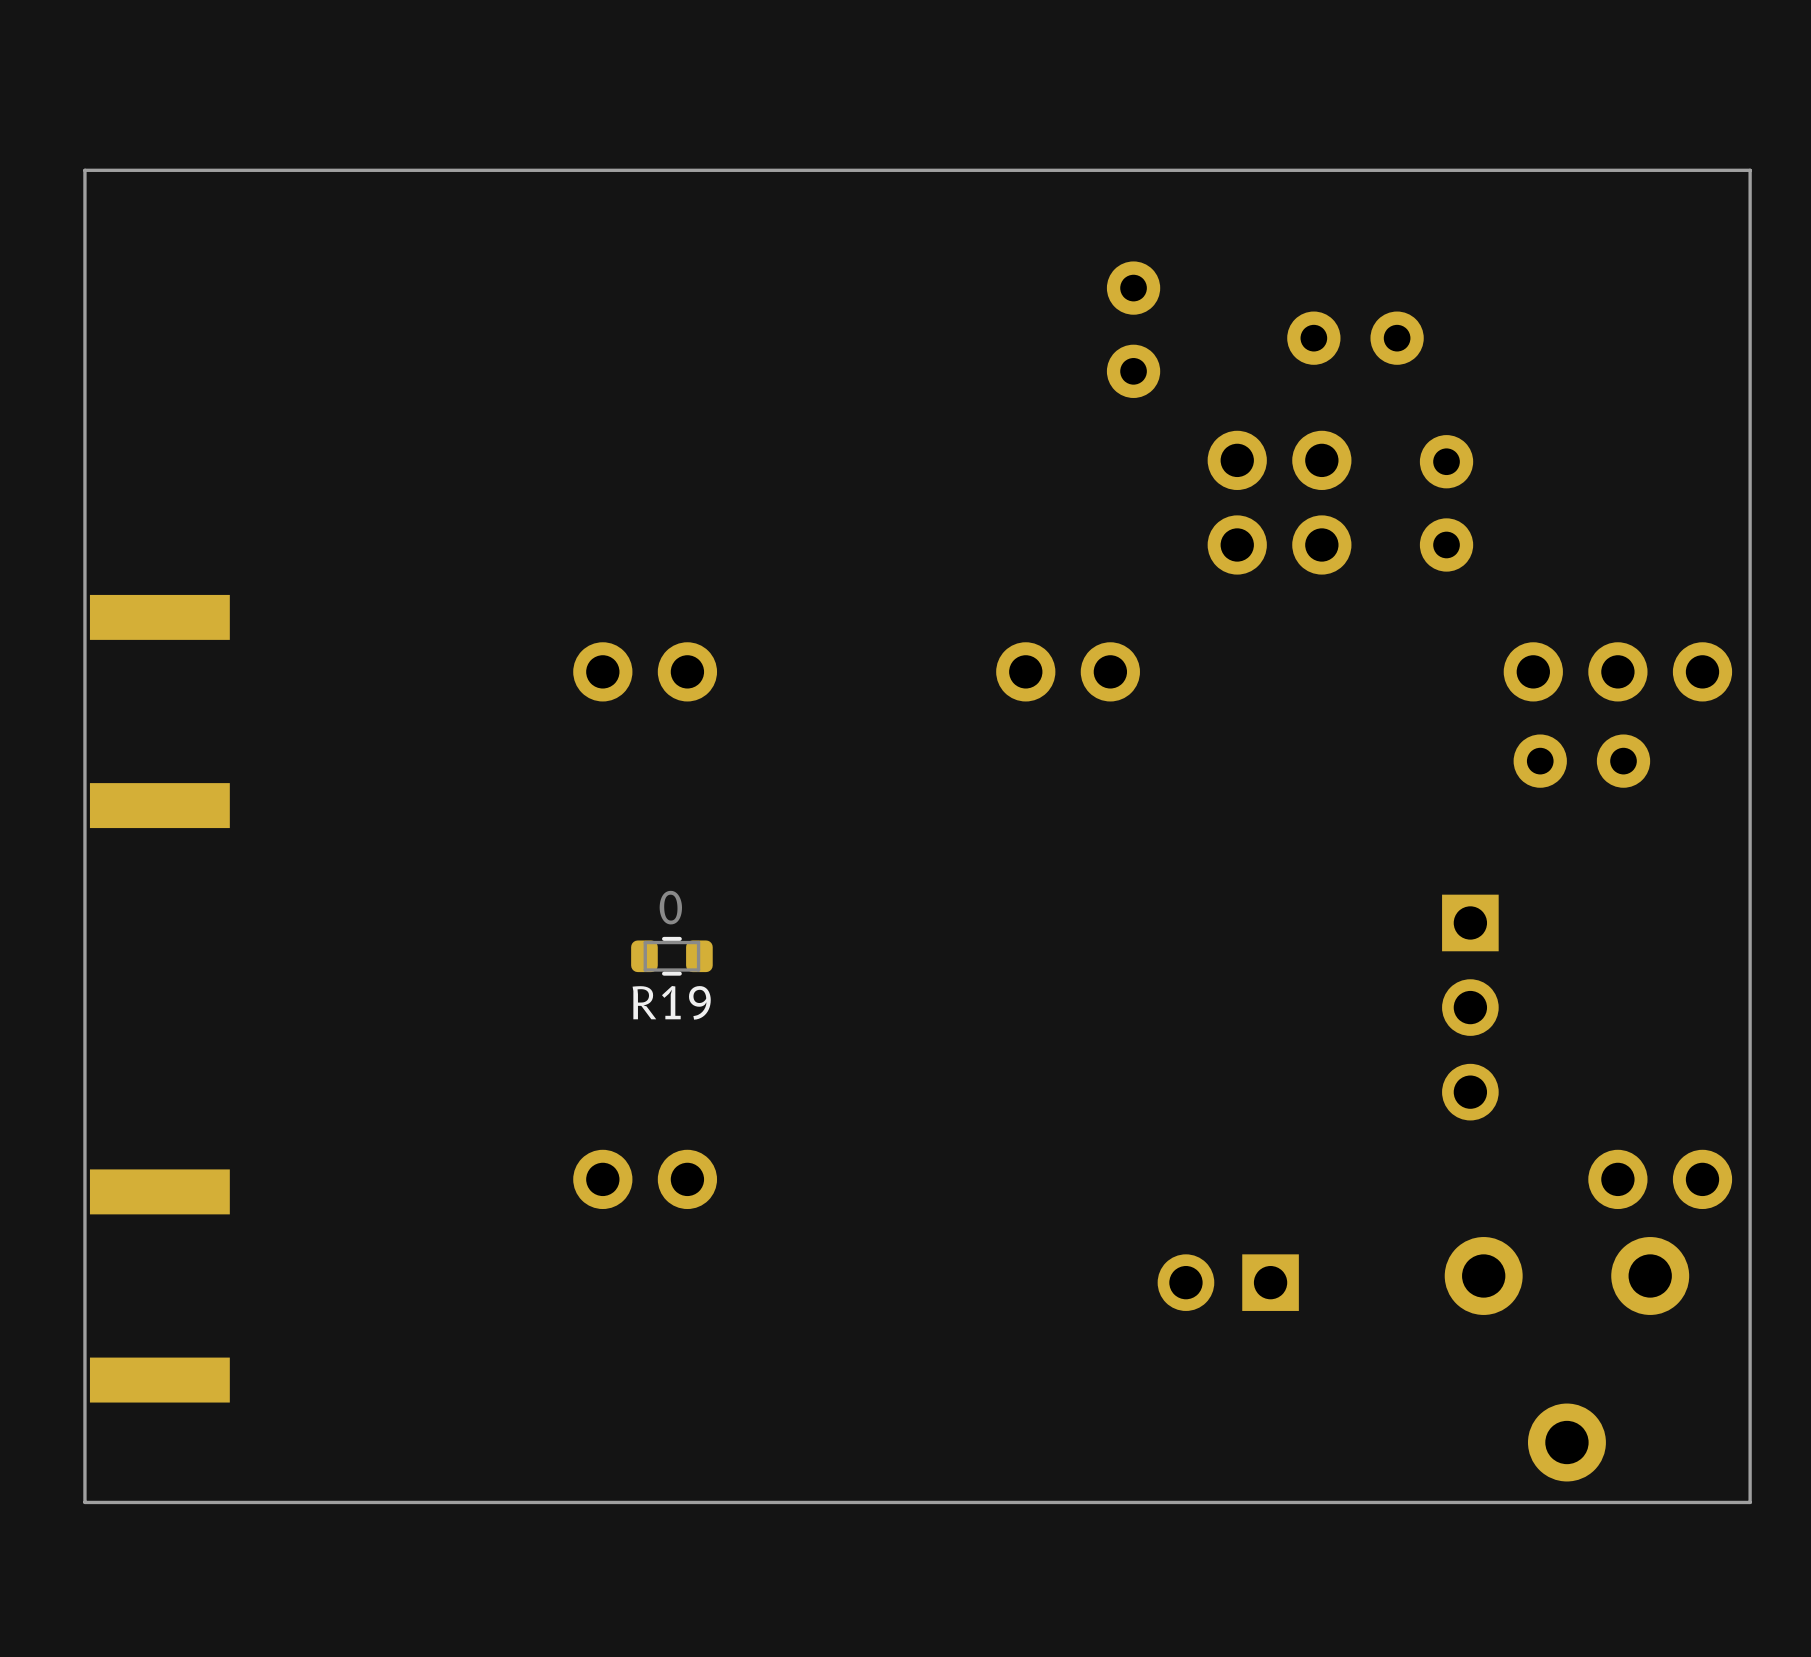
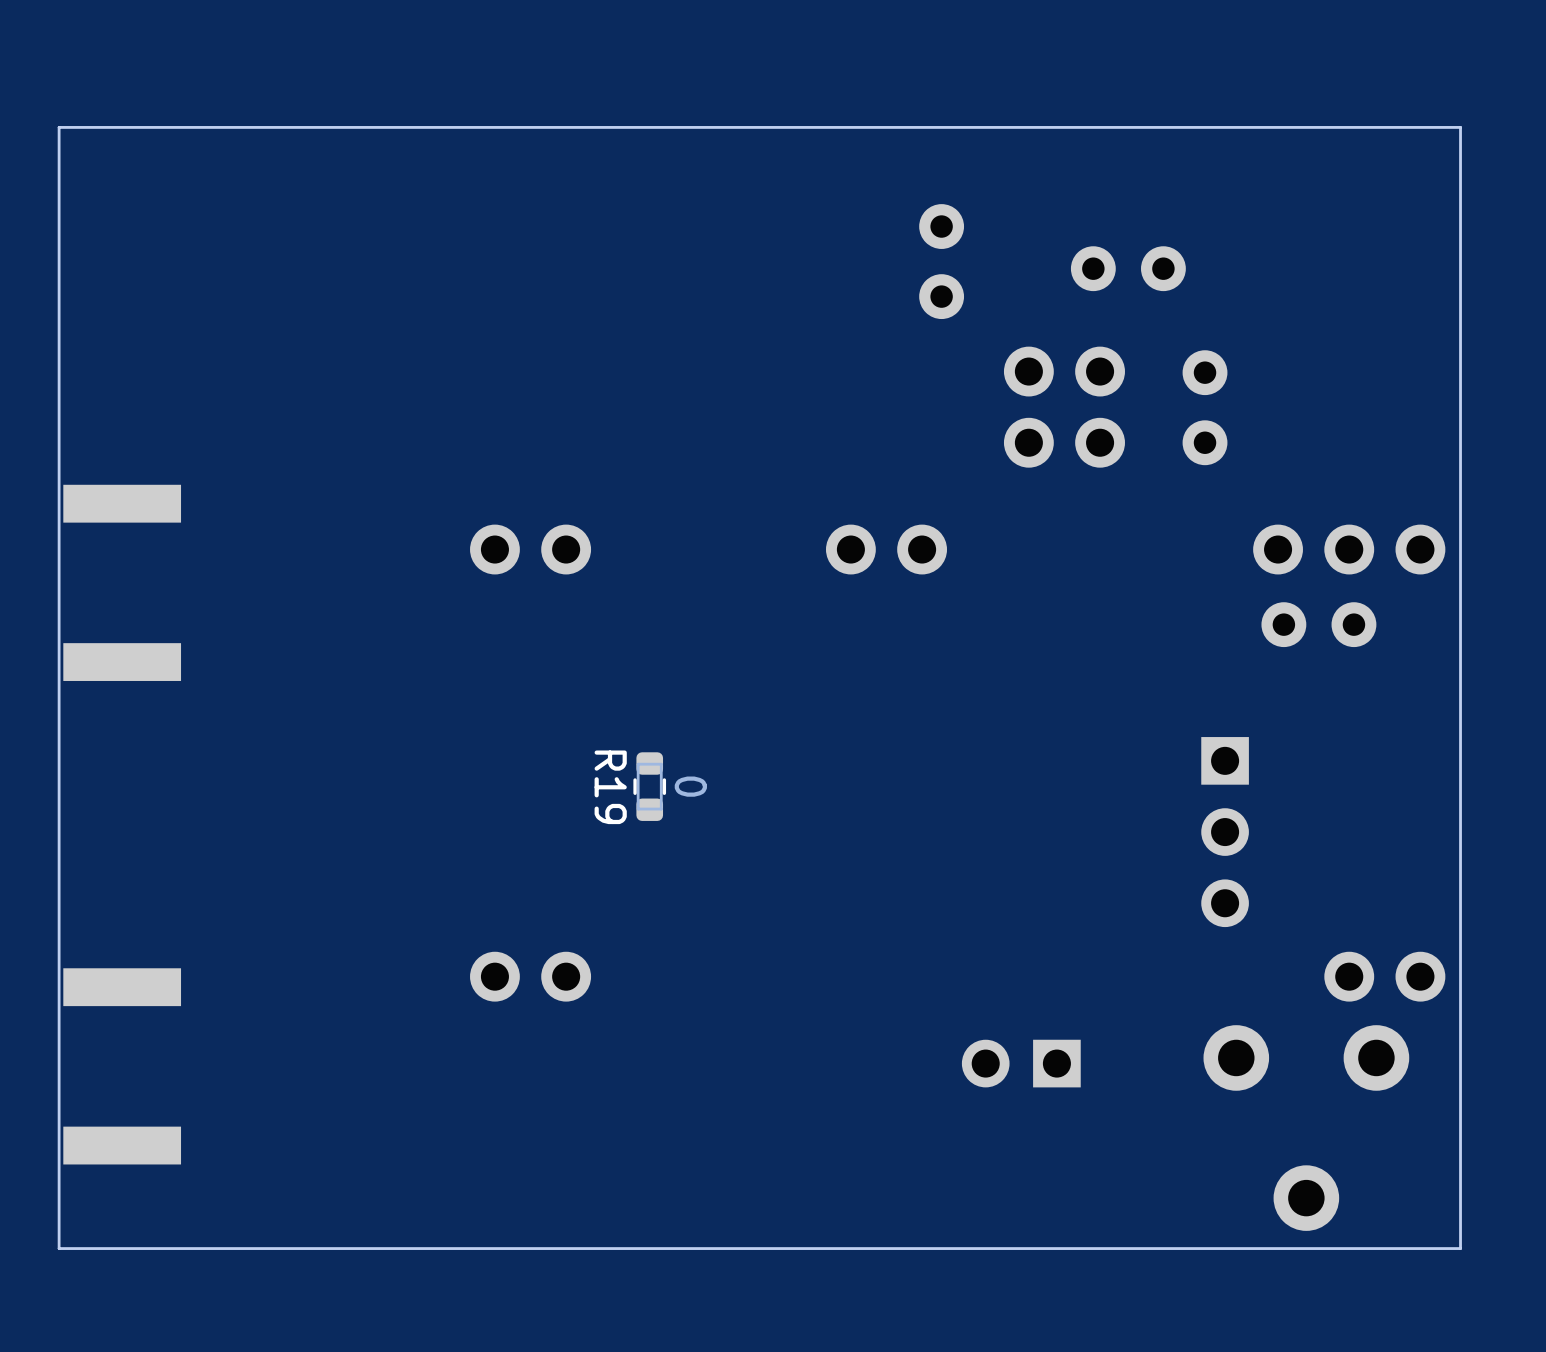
R19 rotation: 0° (671, 956) -> 90° clockwise (649, 786)
R19 position: (671, 956) -> (649, 786)

